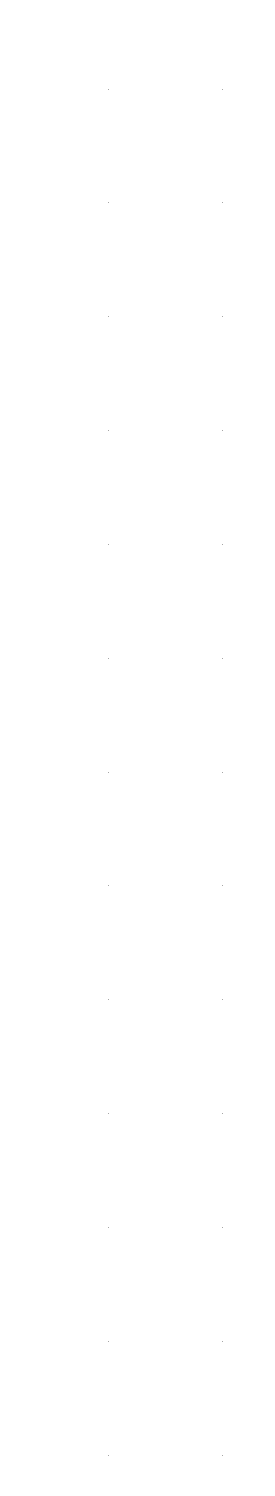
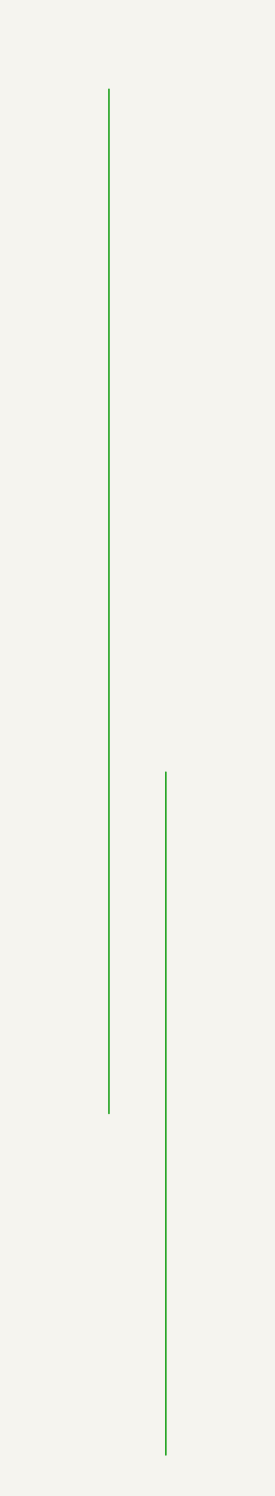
wire: none -> (108, 89) (108, 1113)
wire: none -> (165, 772) (165, 1455)

